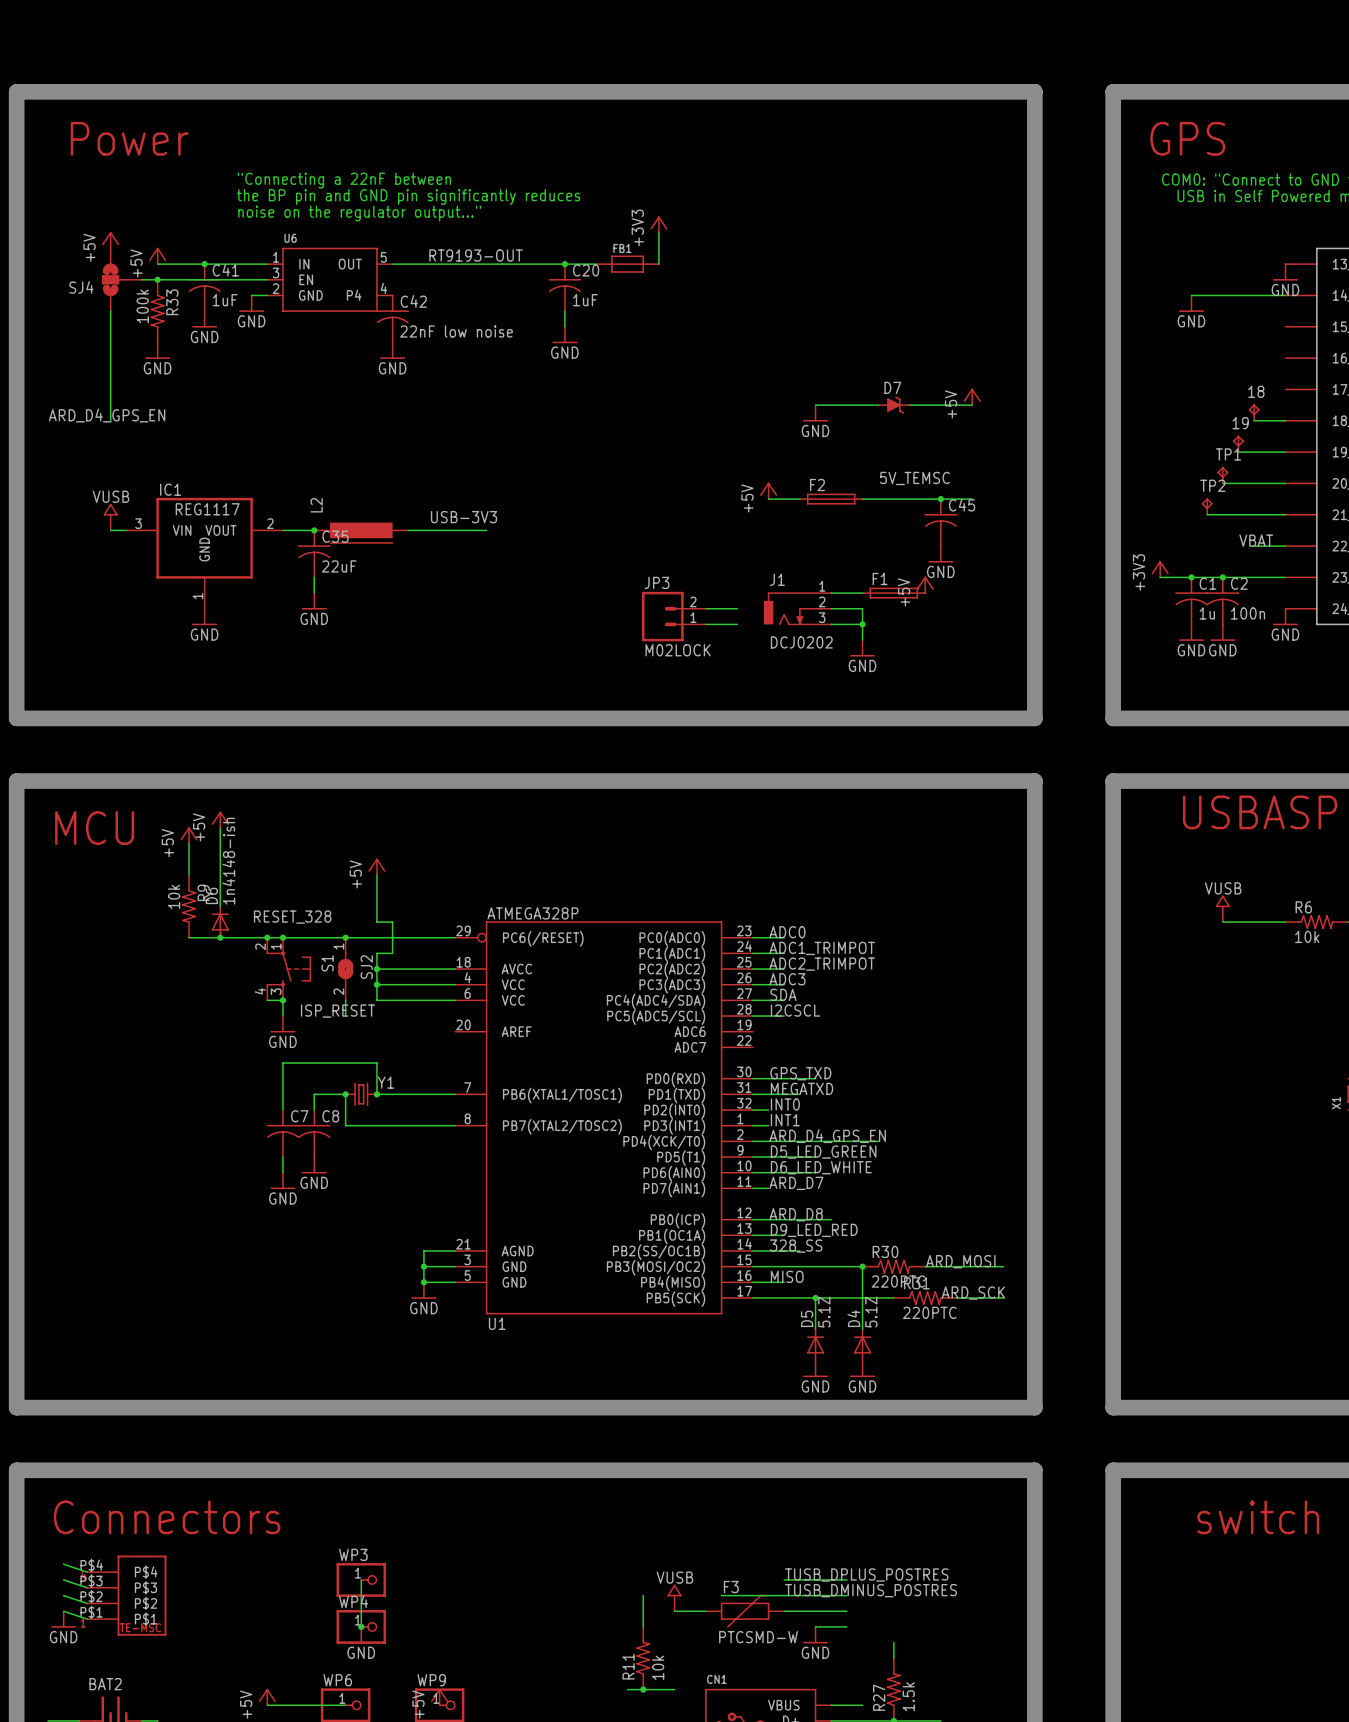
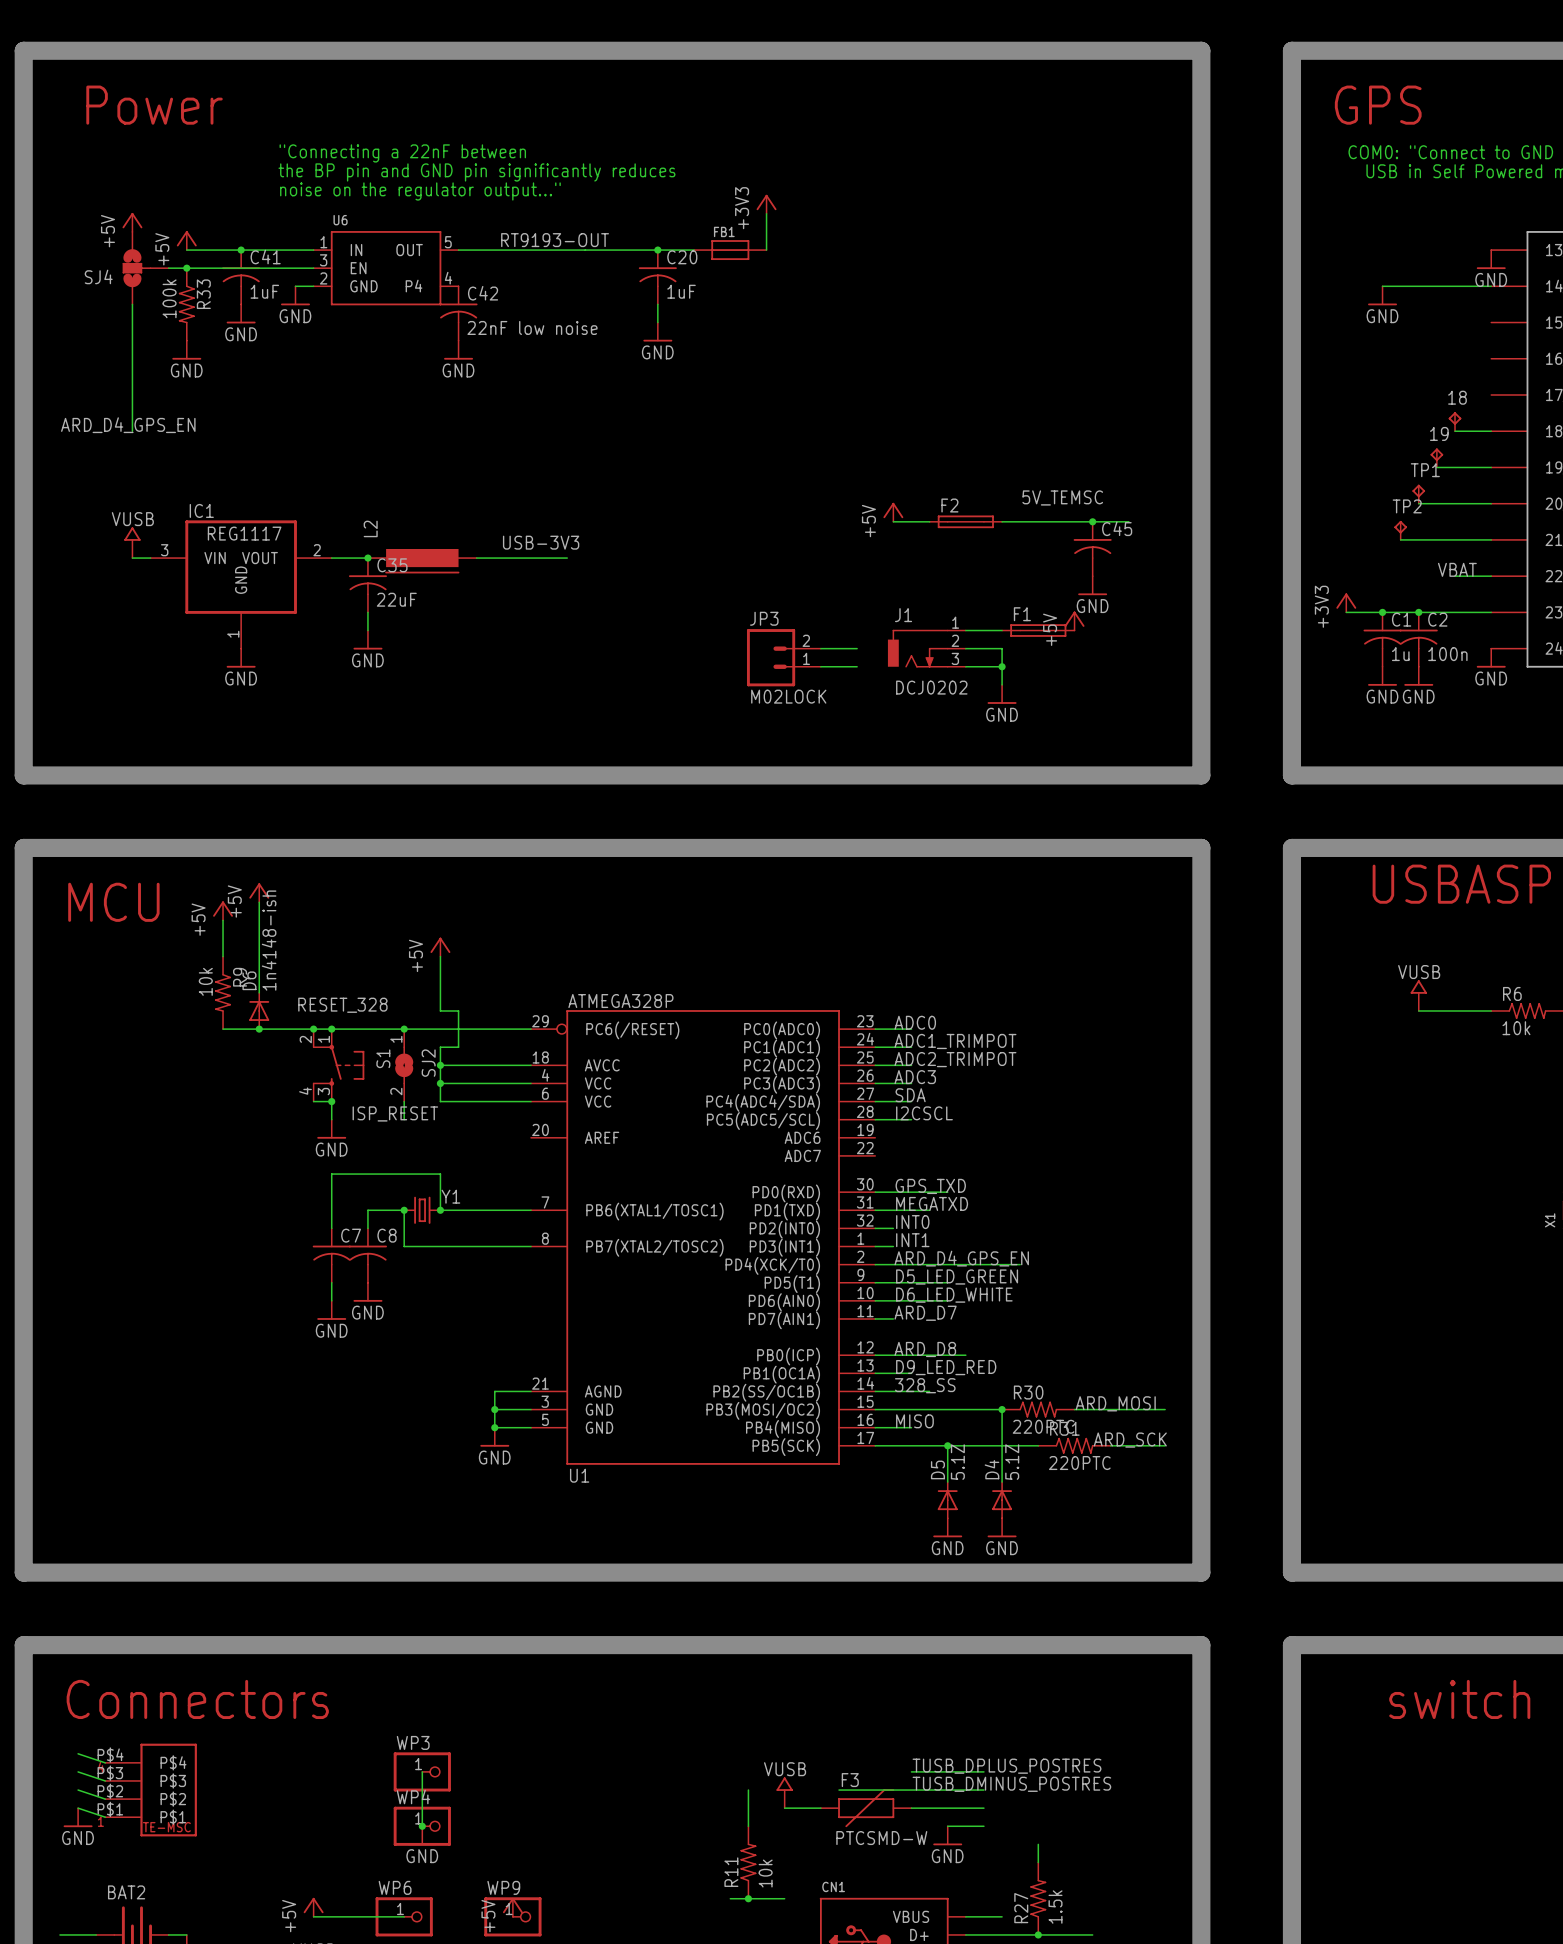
power symbol: +5V (972, 396) -> none
wire: (815, 405) (878, 405) -> none
D7: (893, 405) -> none
wire: (909, 405) (972, 405) -> none
power symbol: GND (815, 413) -> none

